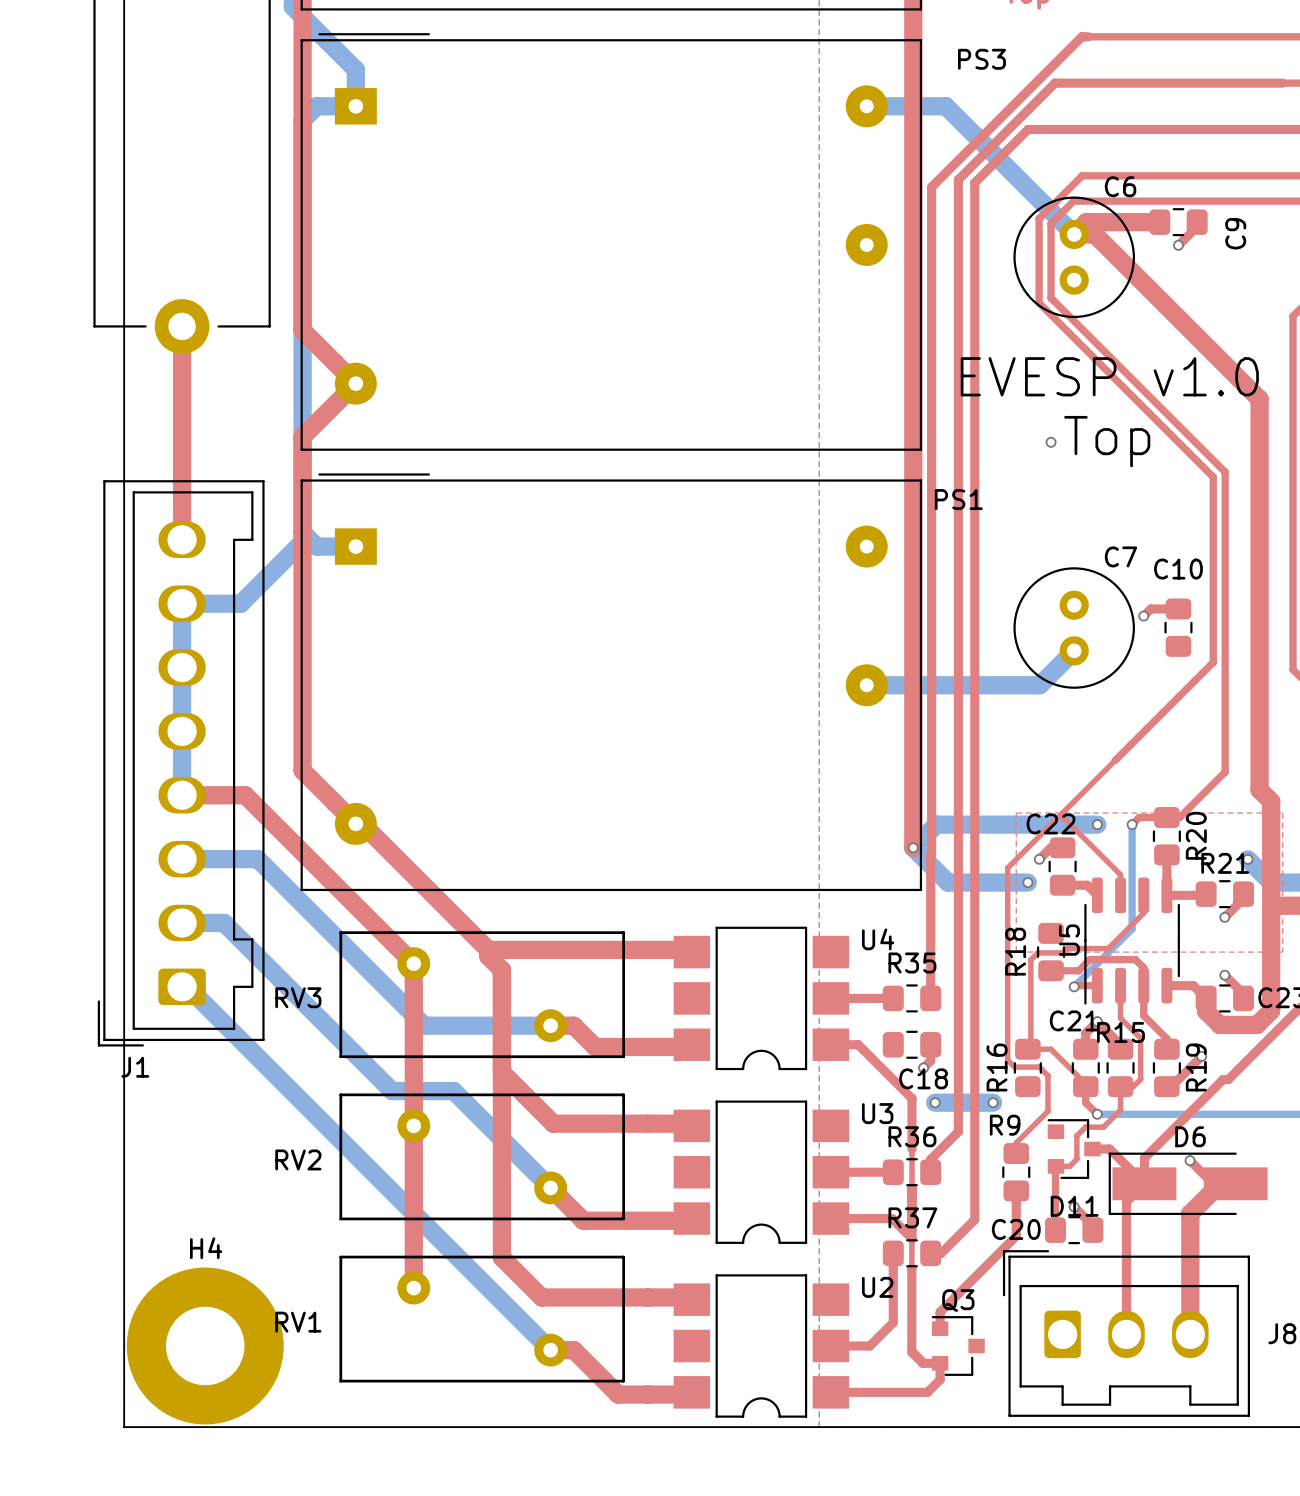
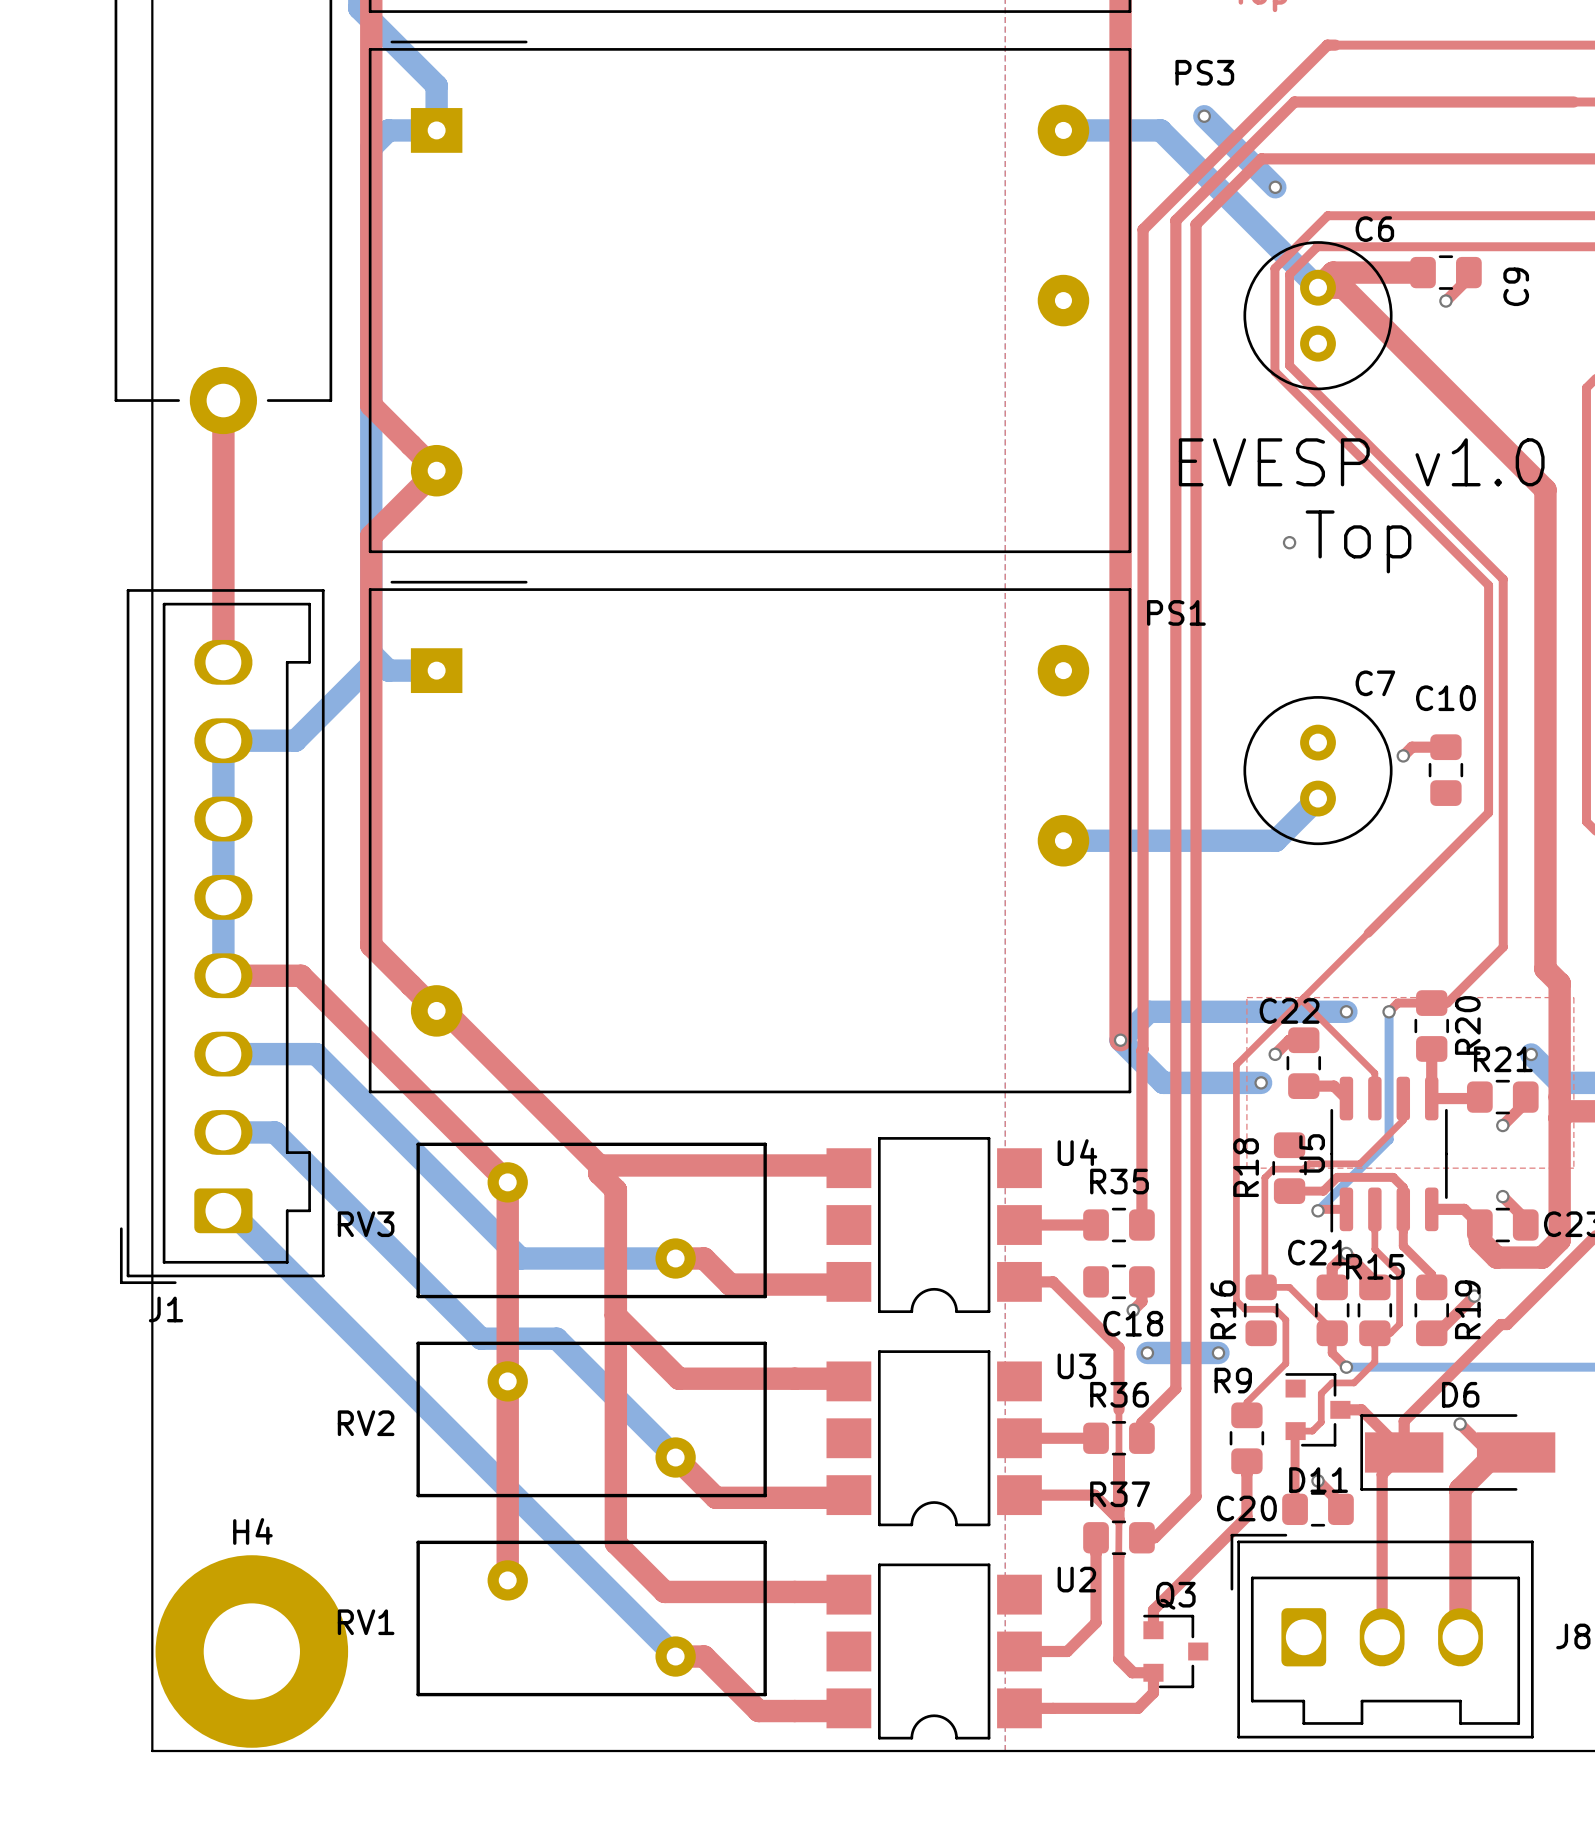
bottom track: none -> (1204, 116) (1275, 187)
via: none -> (1204, 116)
via: none -> (1275, 187)

